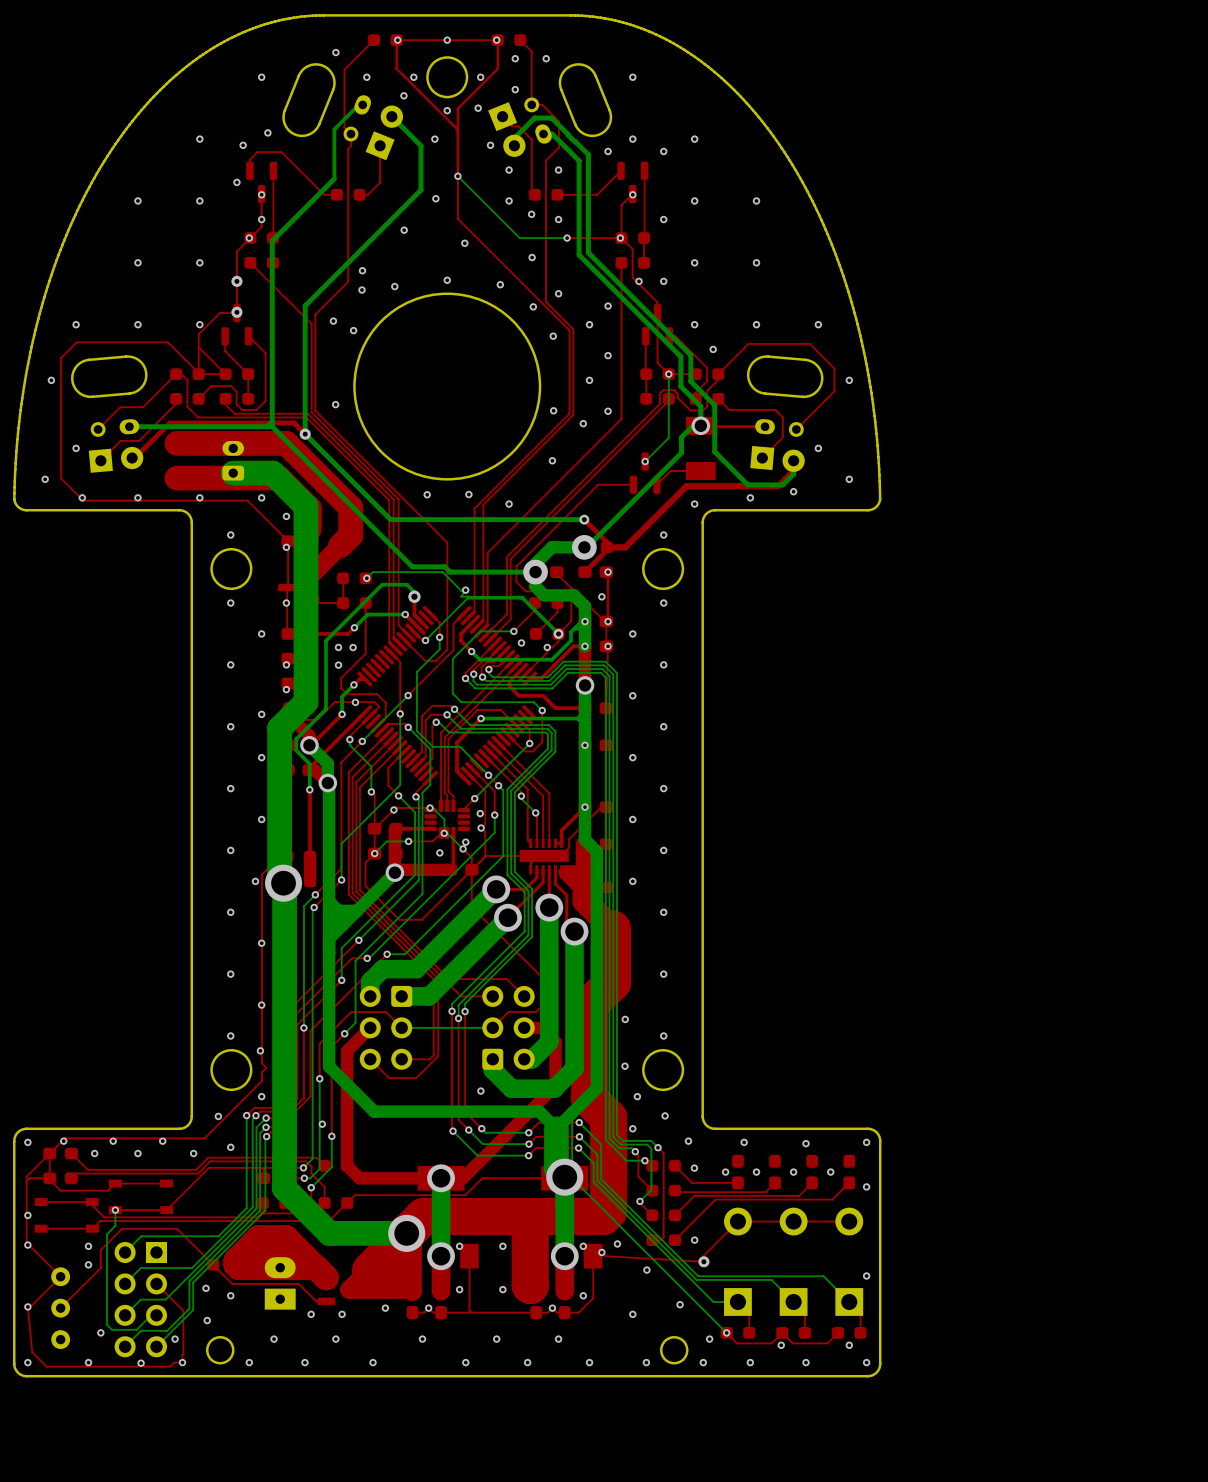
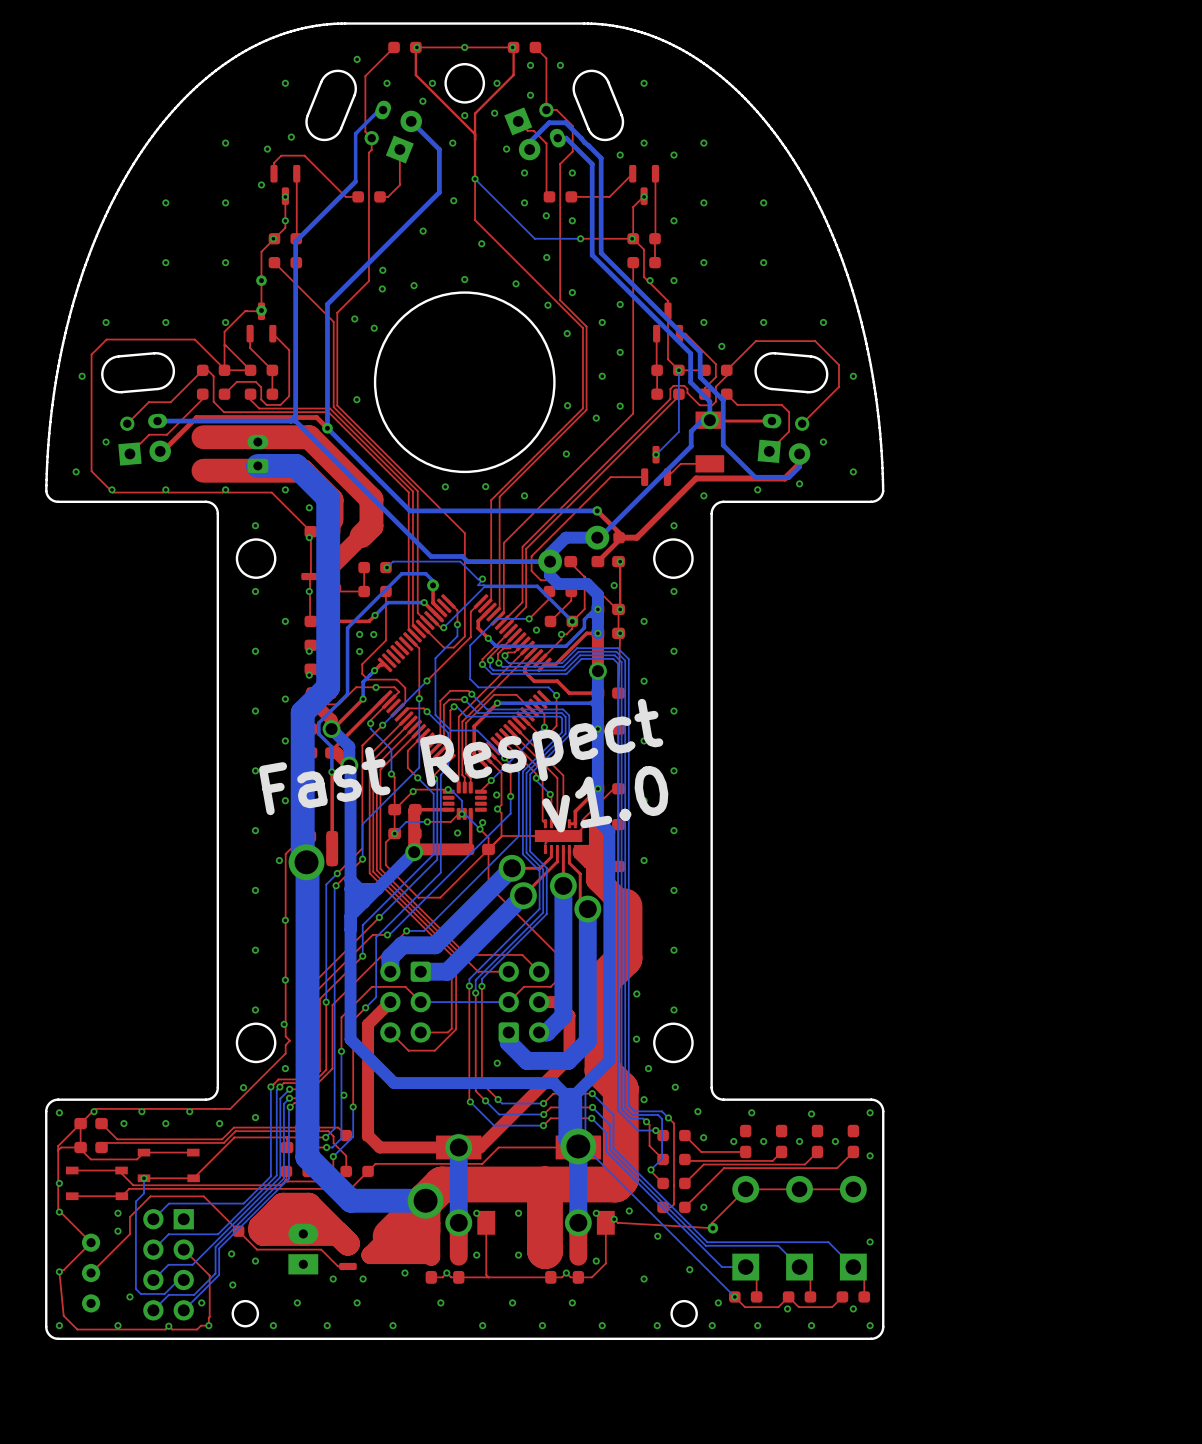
text: none -> Fast Respect (461, 757)
text: none -> v1.0 (605, 799)

